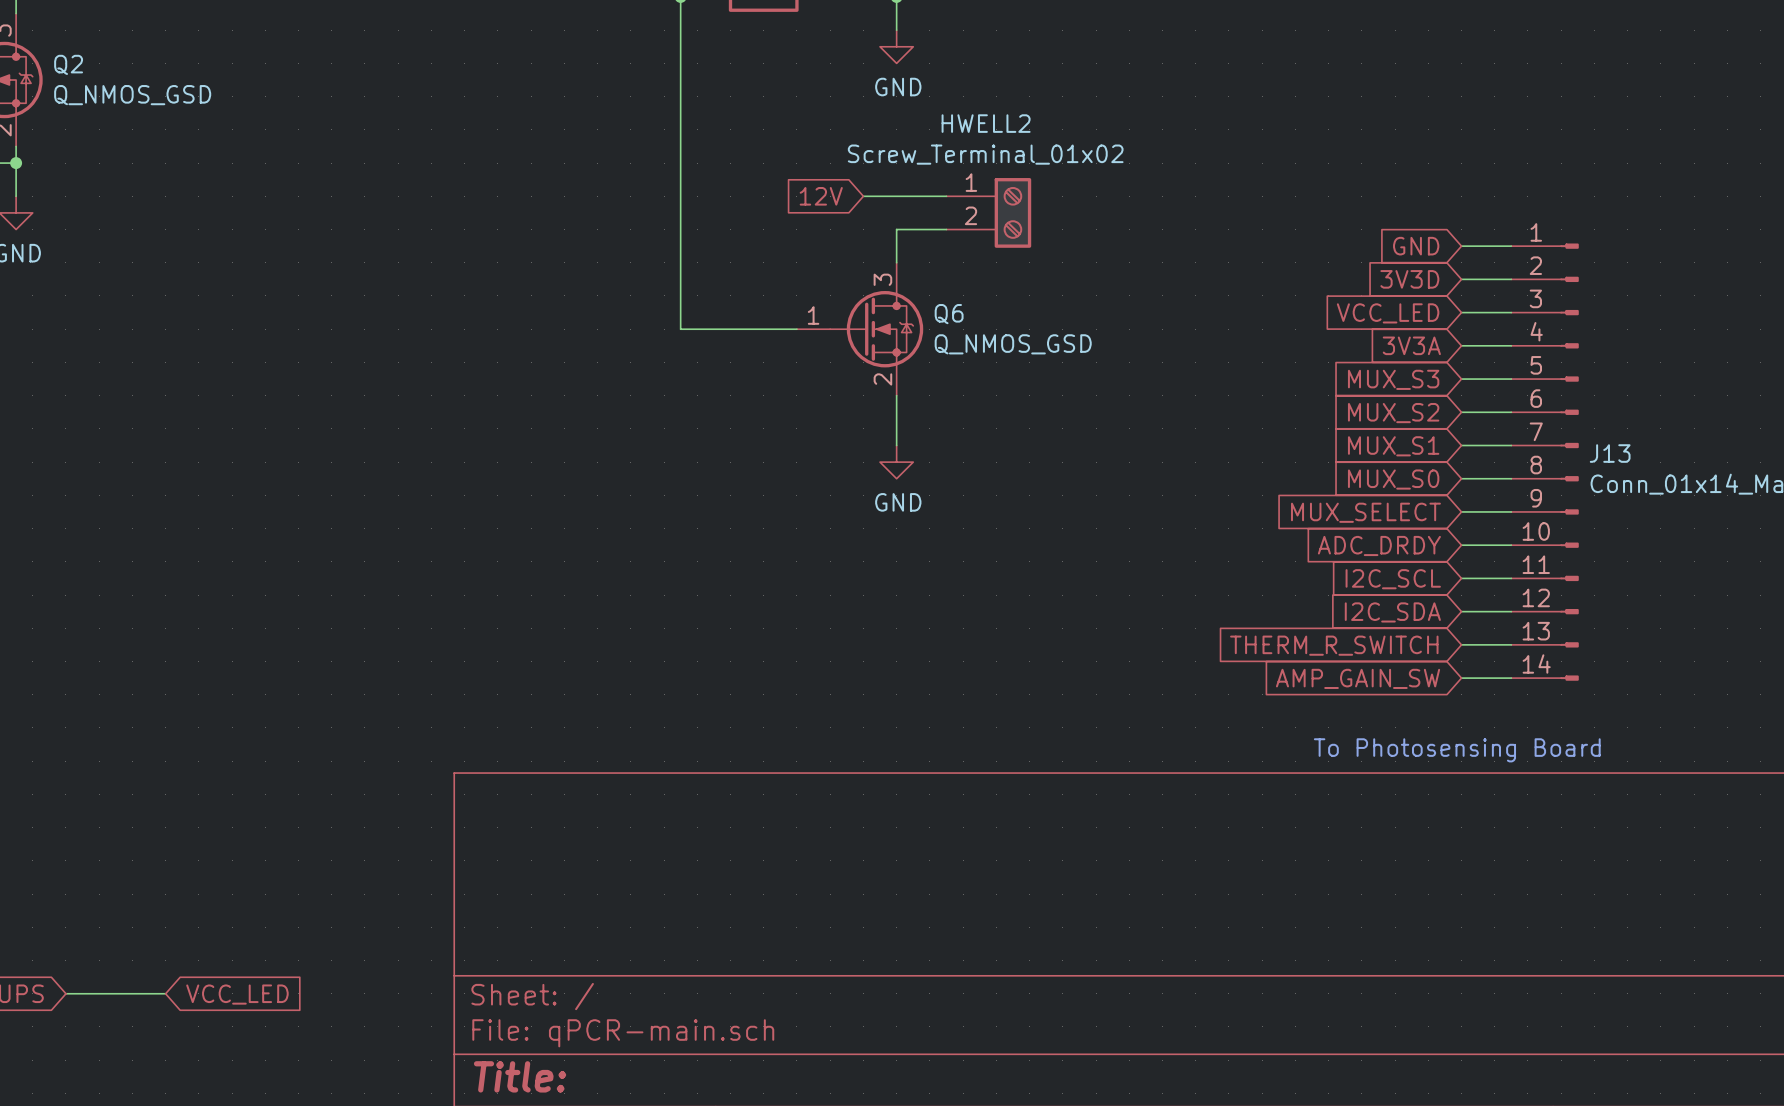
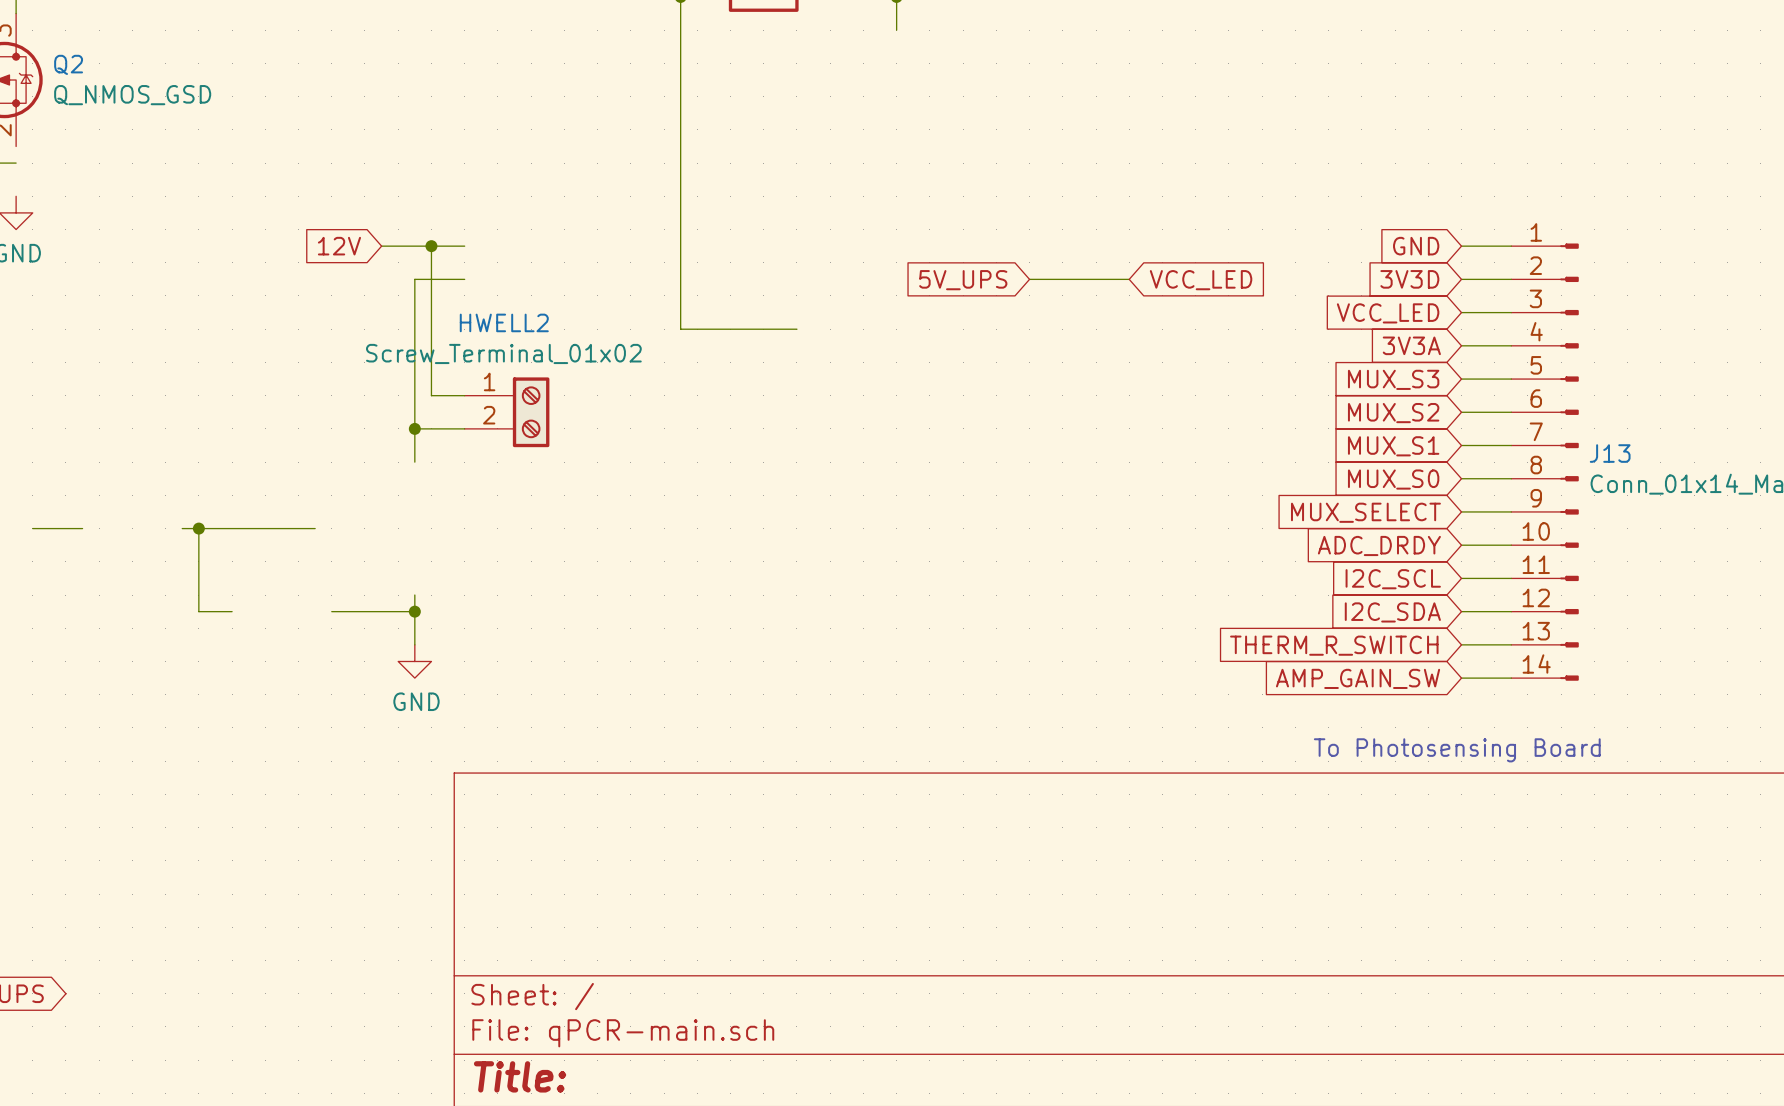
power symbol: GND (896, 46) -> none
wire: (16, 146) (16, 196) -> none
junction: (16, 163) -> none
global label: 12V (821, 196) -> none
wire: (863, 196) (946, 196) -> none
HWELL2 position: (988, 212) -> (507, 412)
wire: (946, 229) (896, 229) (896, 262) -> none
global label: none -> 12V (339, 246)
wire: none -> (381, 246) (464, 246)
wire: none -> (431, 246) (431, 395) (464, 395)
junction: none -> (431, 246)
wire: none -> (464, 279) (414, 279) (414, 462)
wire: none -> (1029, 279) (1129, 279)
global label: none -> 5V_UPS (963, 280)
global label: none -> VCC_LED (1201, 280)
Q6: Q_NMOS_GSD (860, 329) -> none
wire: (896, 395) (896, 445) -> none
wire: none -> (414, 428) (464, 428)
junction: none -> (414, 428)
power symbol: GND (896, 462) -> none
wire: none -> (32, 528) (82, 528)
wire: none -> (182, 528) (315, 528)
wire: none -> (198, 528) (198, 611) (232, 611)
junction: none -> (198, 528)
wire: none -> (414, 595) (414, 644)
wire: none -> (331, 611) (414, 611)
junction: none -> (414, 611)
power symbol: none -> GND (414, 661)
wire: (65, 993) (165, 993) -> none
global label: VCC_LED (237, 994) -> none

